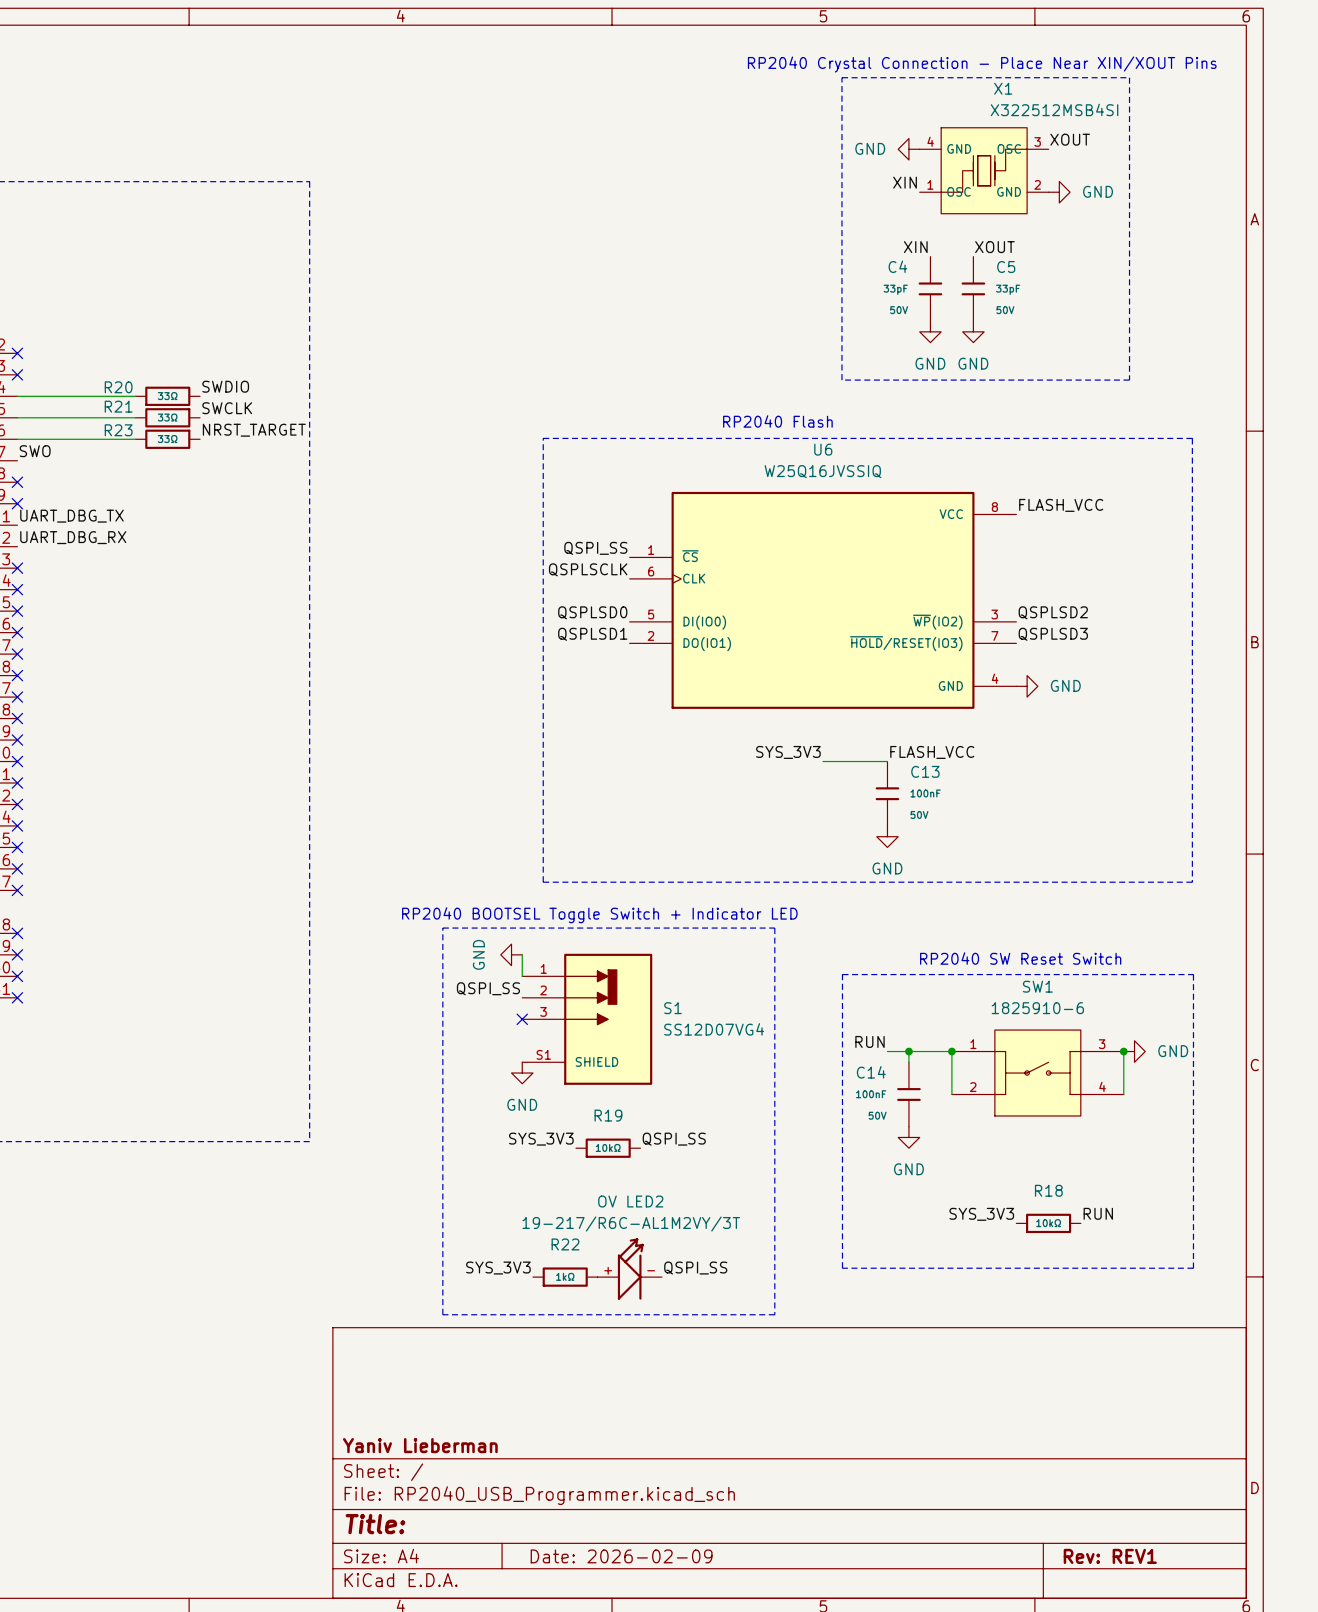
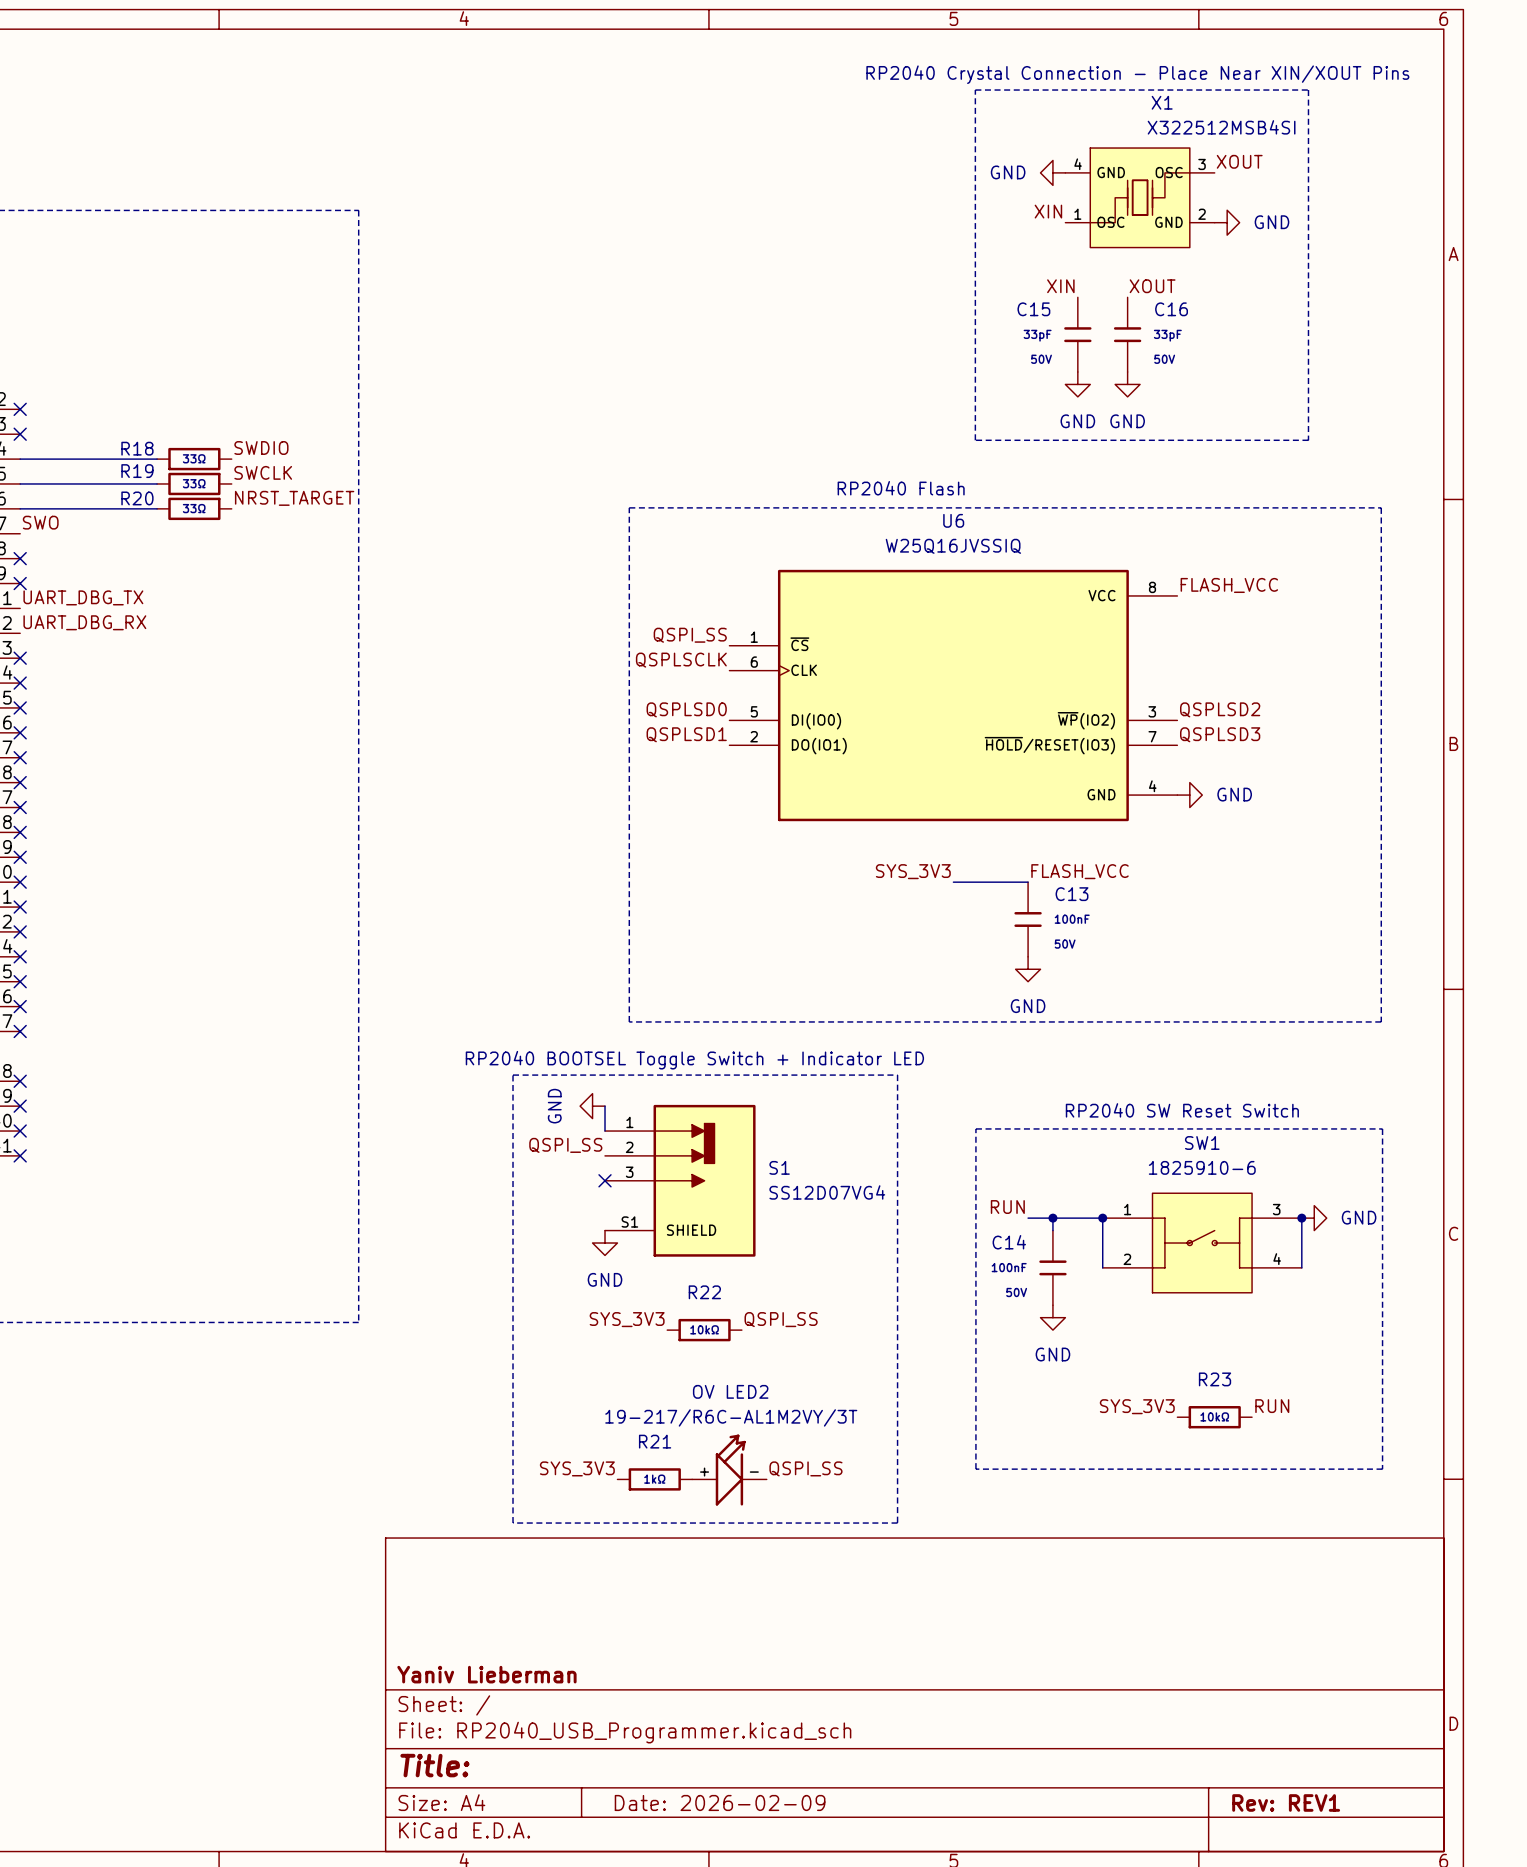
C4 name: C4 (897, 266) -> C15 (1033, 309)
C5 name: C5 (1006, 267) -> C16 (1171, 309)
R20 name: R20 (118, 387) -> R18 (137, 448)
R21 name: R21 (118, 406) -> R19 (137, 471)
R23 name: R23 (118, 430) -> R20 (137, 498)
R19 name: R19 (608, 1115) -> R22 (704, 1292)
R18 name: R18 (1048, 1190) -> R23 (1215, 1379)
R22 name: R22 (565, 1244) -> R21 (655, 1441)

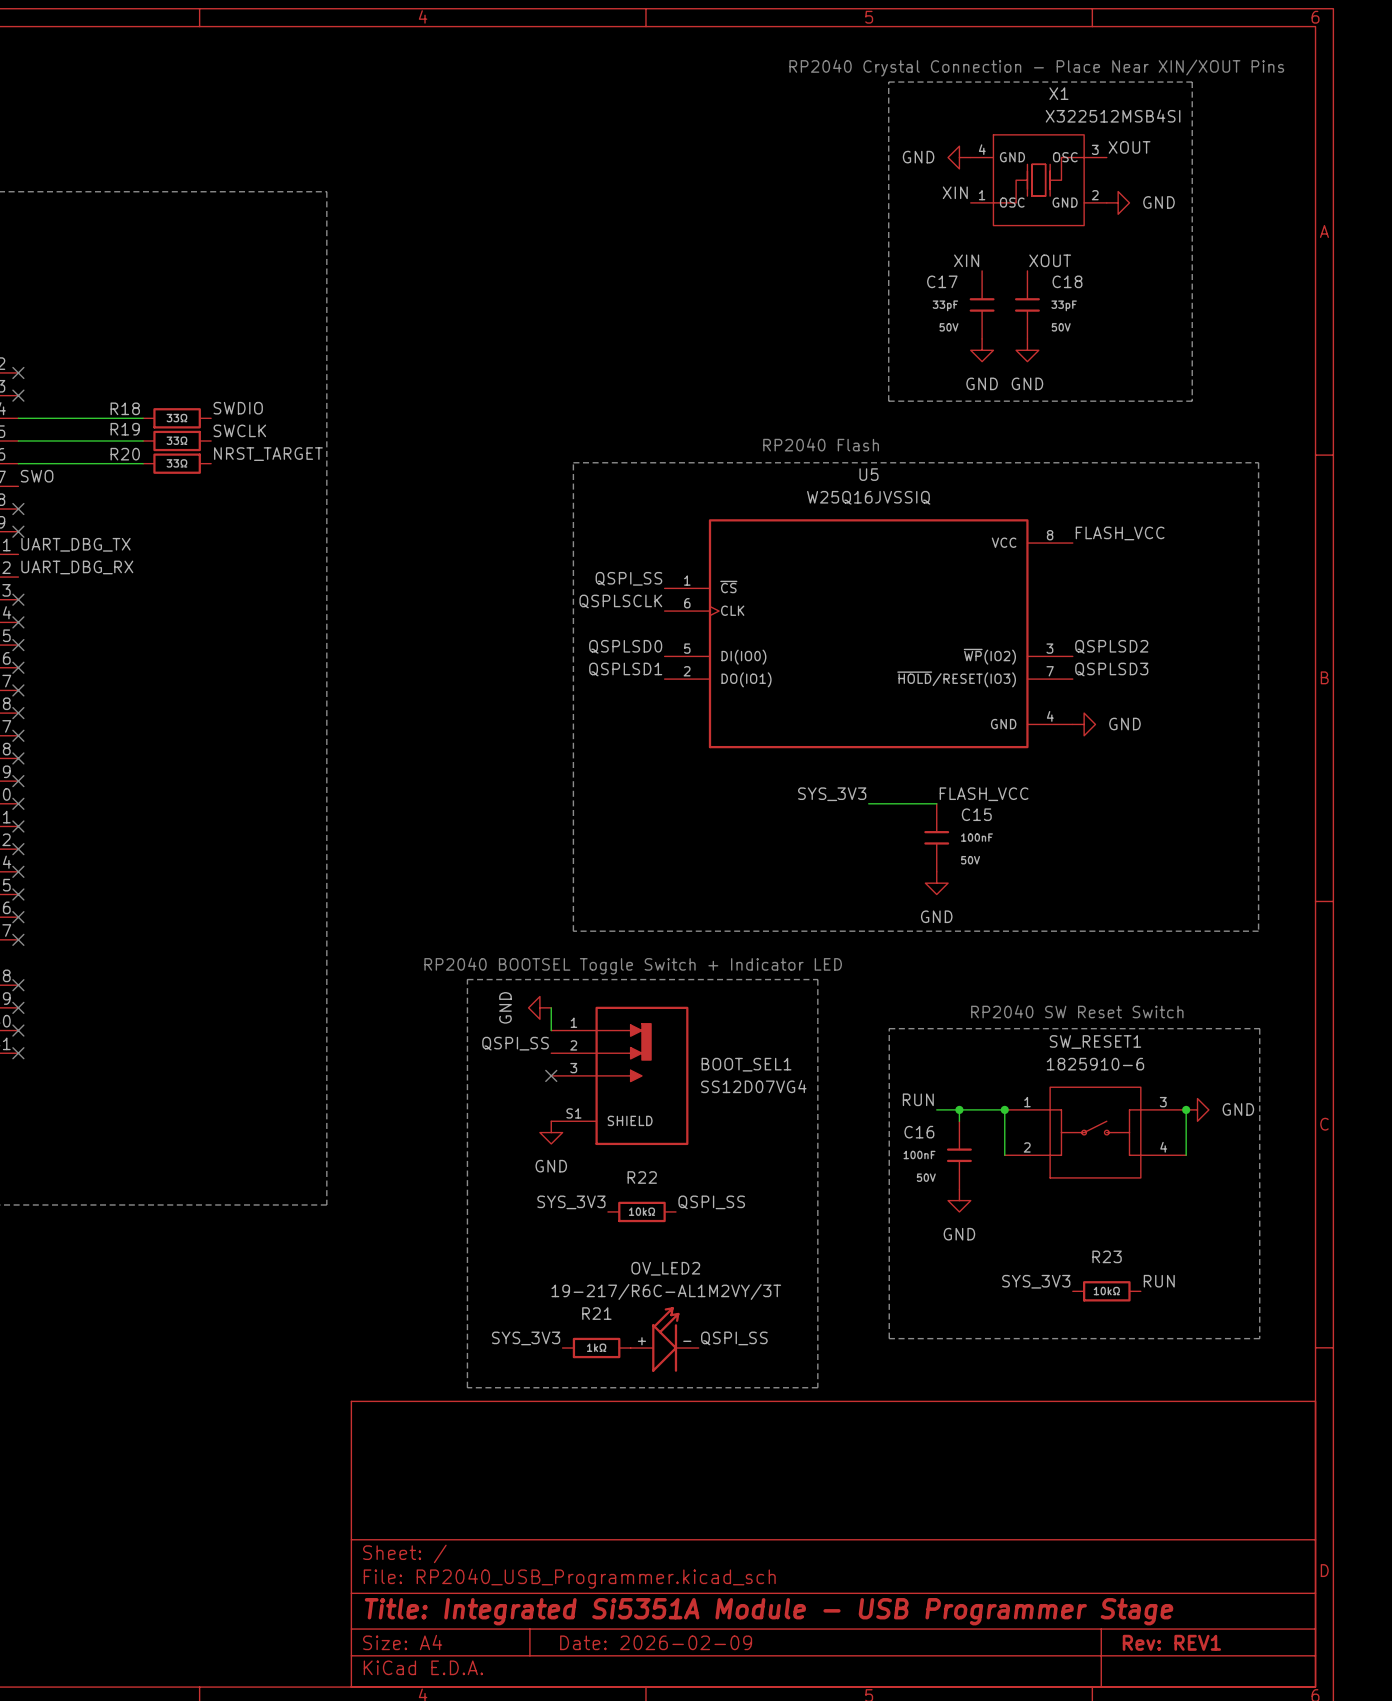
C15 name: C15 (1033, 309) -> C17 (942, 281)
C16 name: C16 (1171, 309) -> C18 (1067, 281)
U6 name: U6 (953, 520) -> U5 (868, 474)
C13 name: C13 (1072, 894) -> C15 (976, 814)
SW1 name: SW1 (1202, 1143) -> SW_RESET1 (1095, 1042)
S1 name: S1 (779, 1167) -> BOOT_SEL1 (746, 1064)
C14 name: C14 (1009, 1242) -> C16 (919, 1132)
OV LED2 name: OV LED2 (730, 1391) -> OV_LED2 (665, 1268)
title block: Yaniv Lieberman (486, 1674) -> none
title block: Title: (434, 1765) -> Title: Integrated Si5351A Module - USB Programmer Stage (769, 1611)

